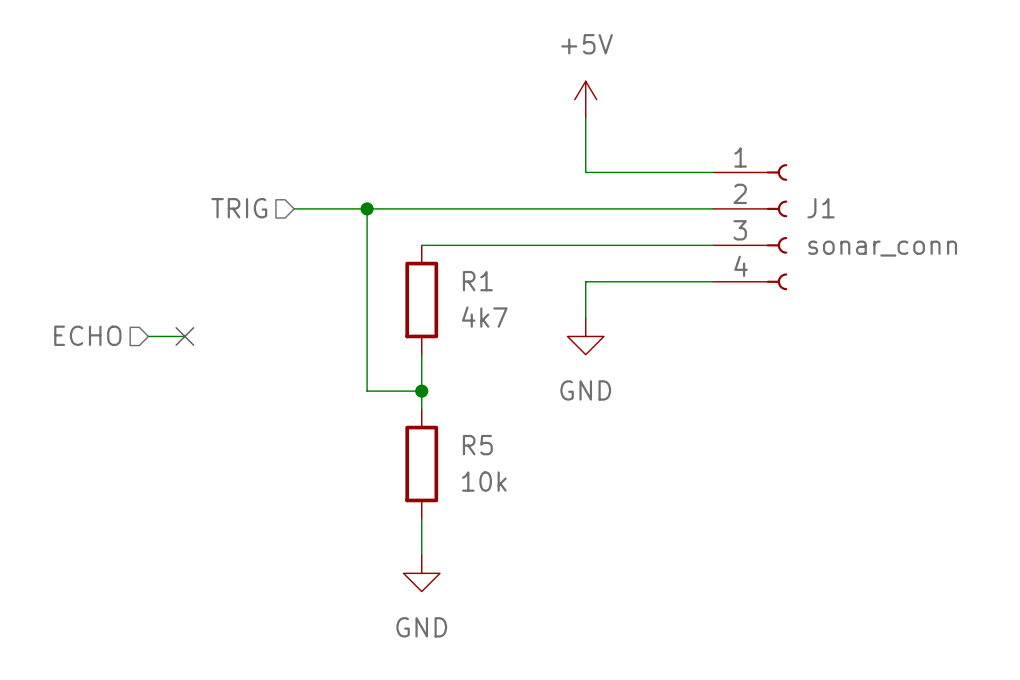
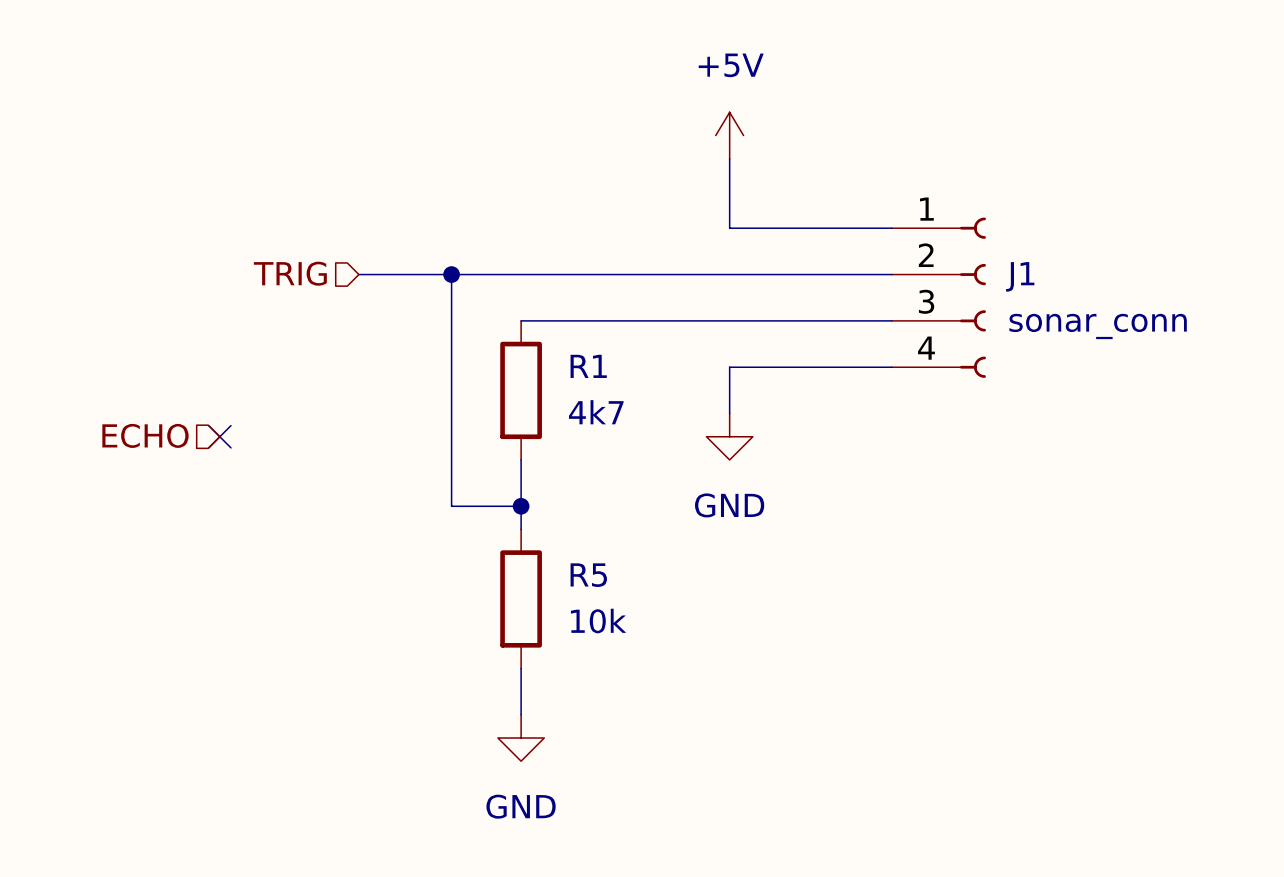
hierarchical label position: ECHO (87, 335) -> ECHO (145, 435)
wire: (148, 336) (184, 336) -> none

